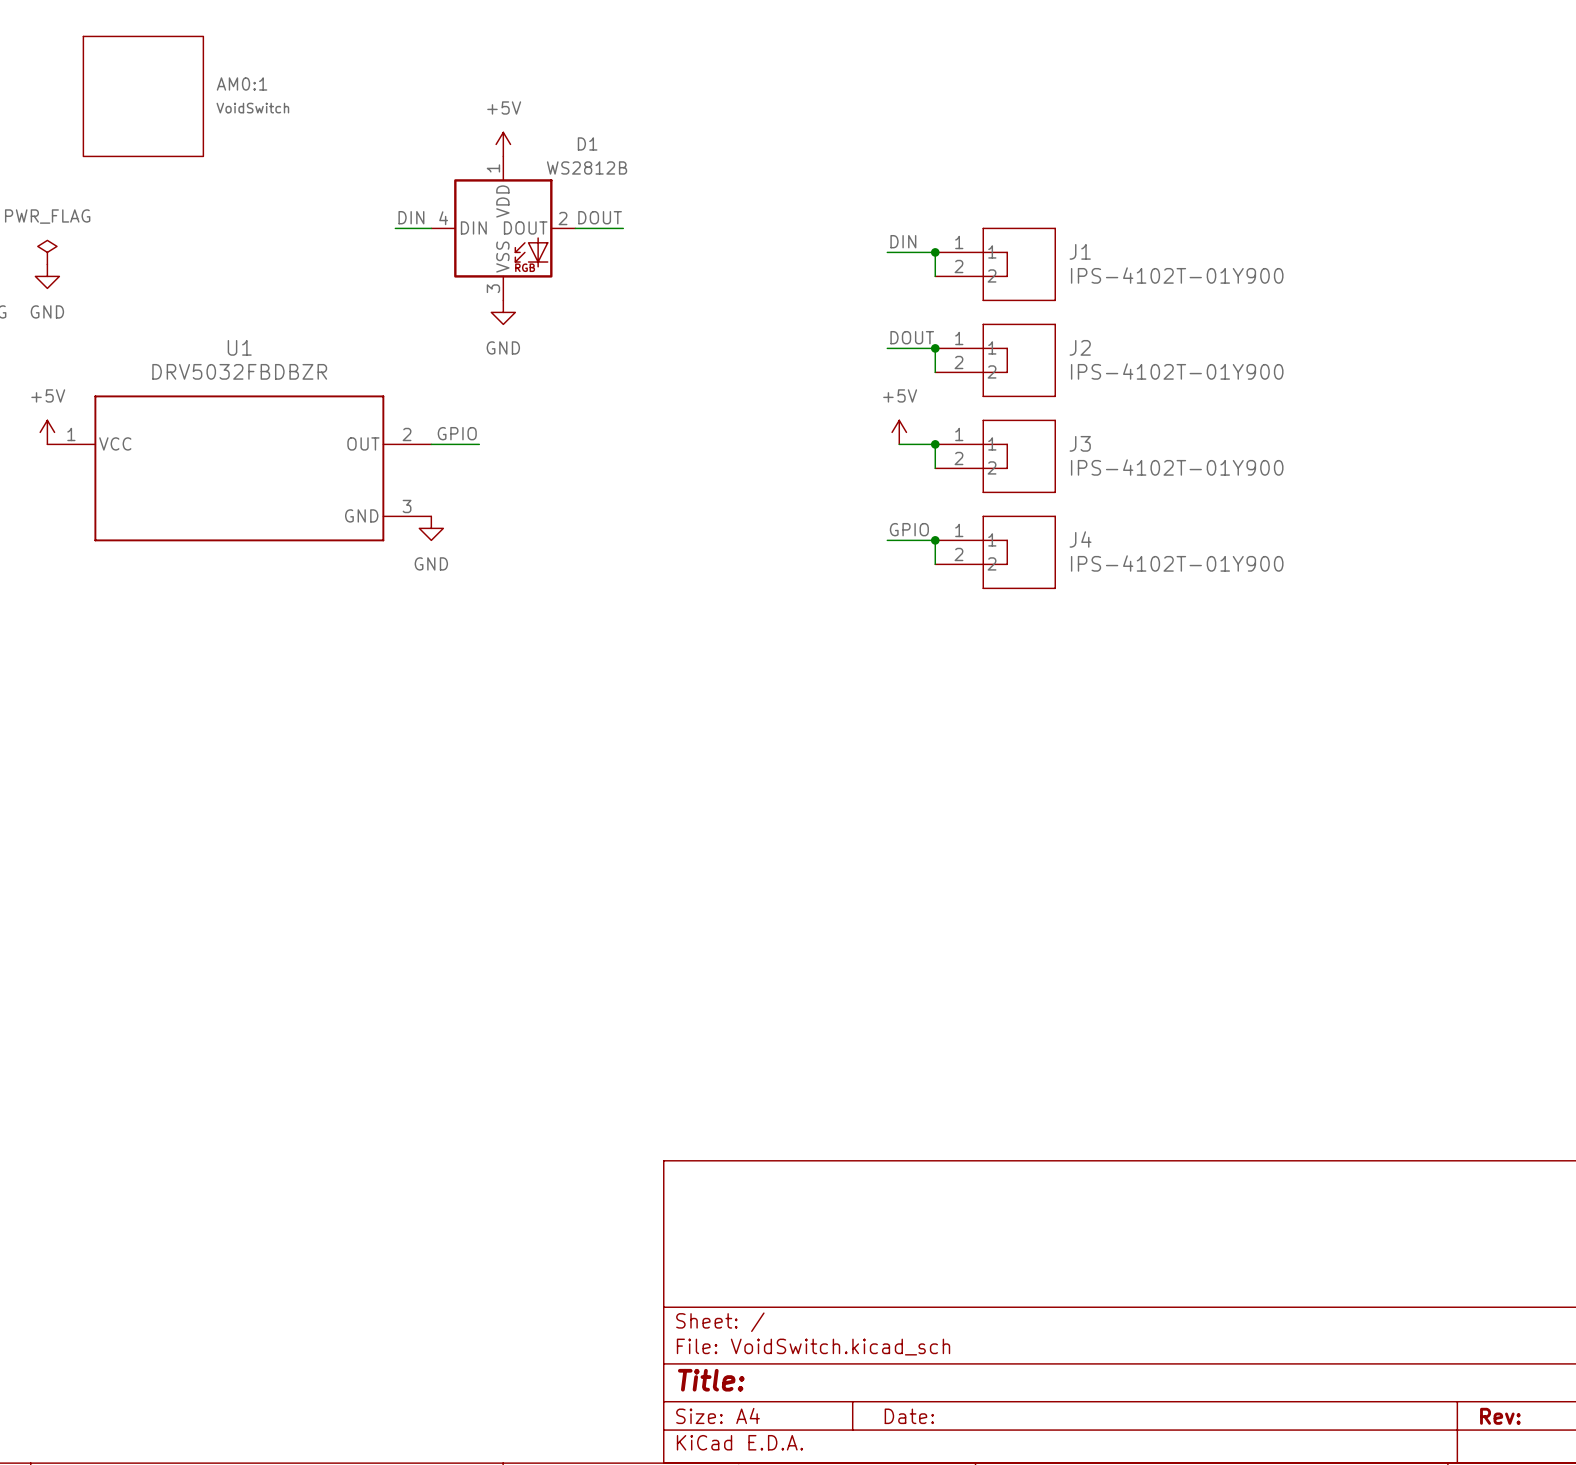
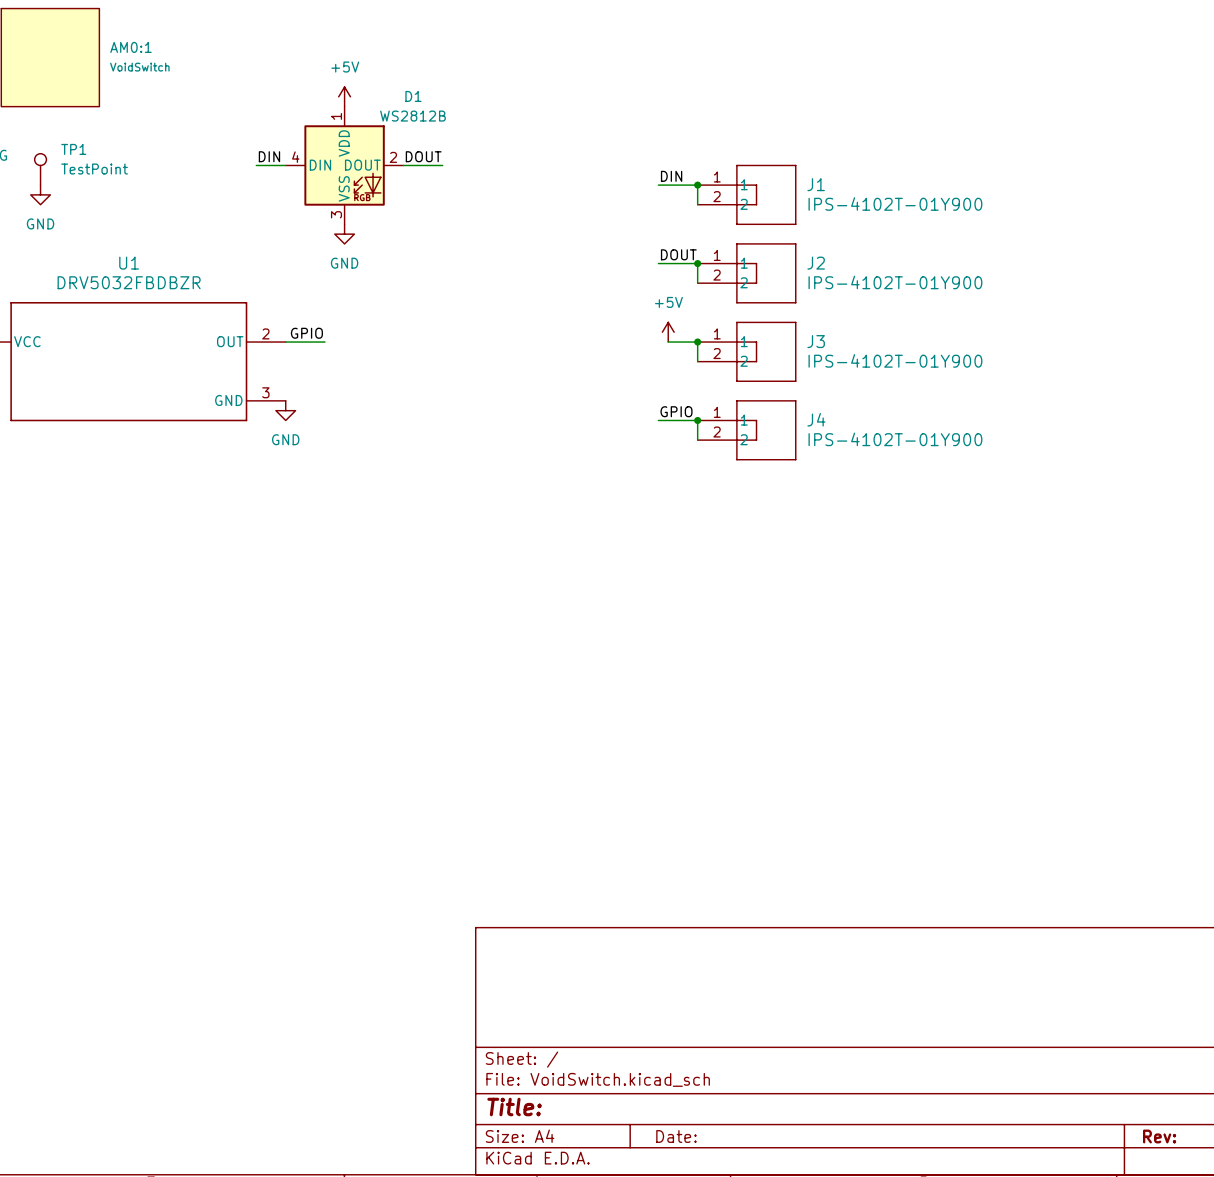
TP1: none -> TestPoint (40, 169)
power symbol: none -> GND (40, 194)

